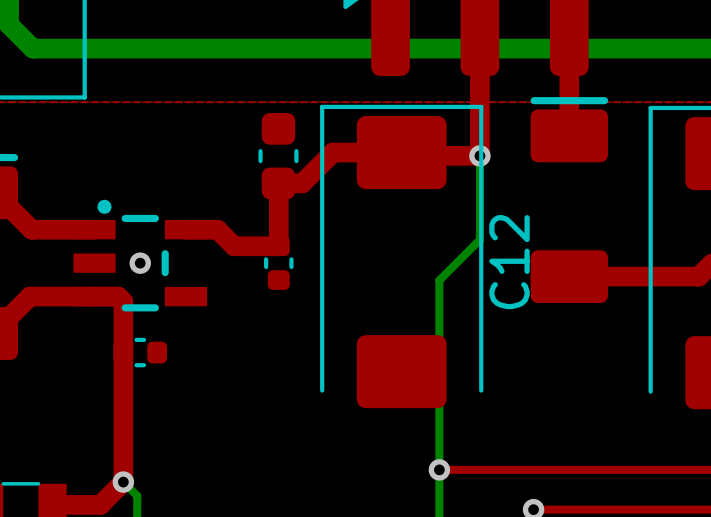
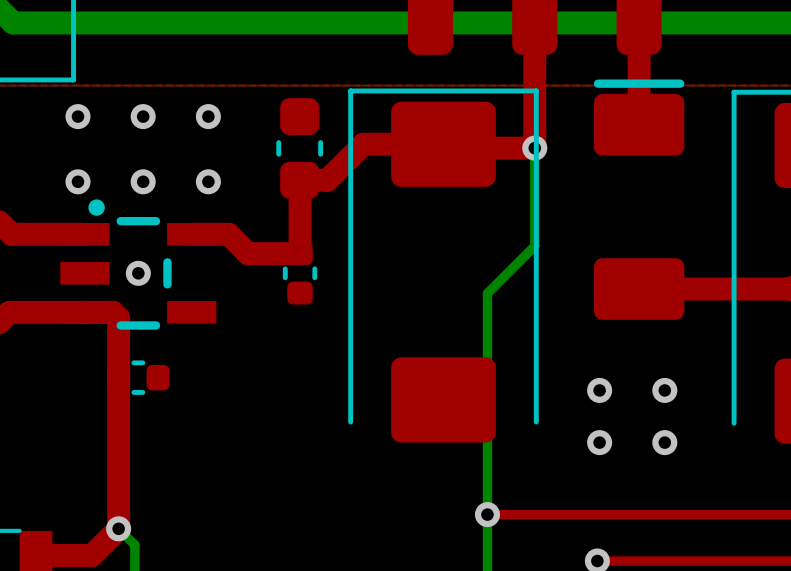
via: none -> (77, 116)
via: none -> (143, 116)
via: none -> (208, 116)
via: none -> (77, 181)
via: none -> (143, 181)
via: none -> (208, 181)
C12 name: C12 (509, 262) -> none
via: none -> (599, 390)
via: none -> (664, 390)
via: none -> (599, 442)
via: none -> (664, 442)

